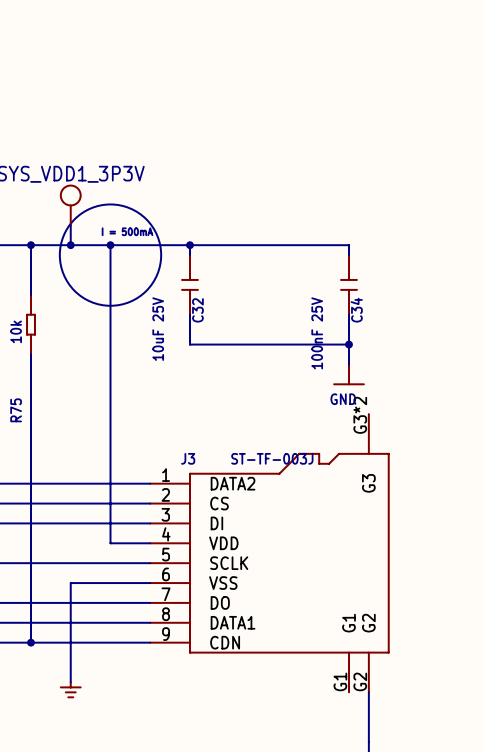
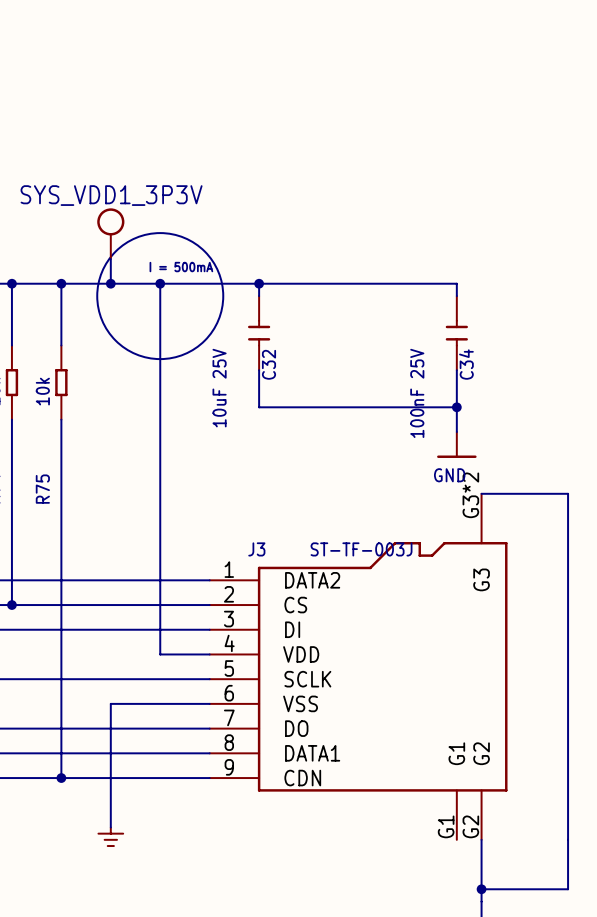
wire: none -> (481, 493) (568, 493) (568, 889) (481, 889)
junction: none -> (481, 889)

